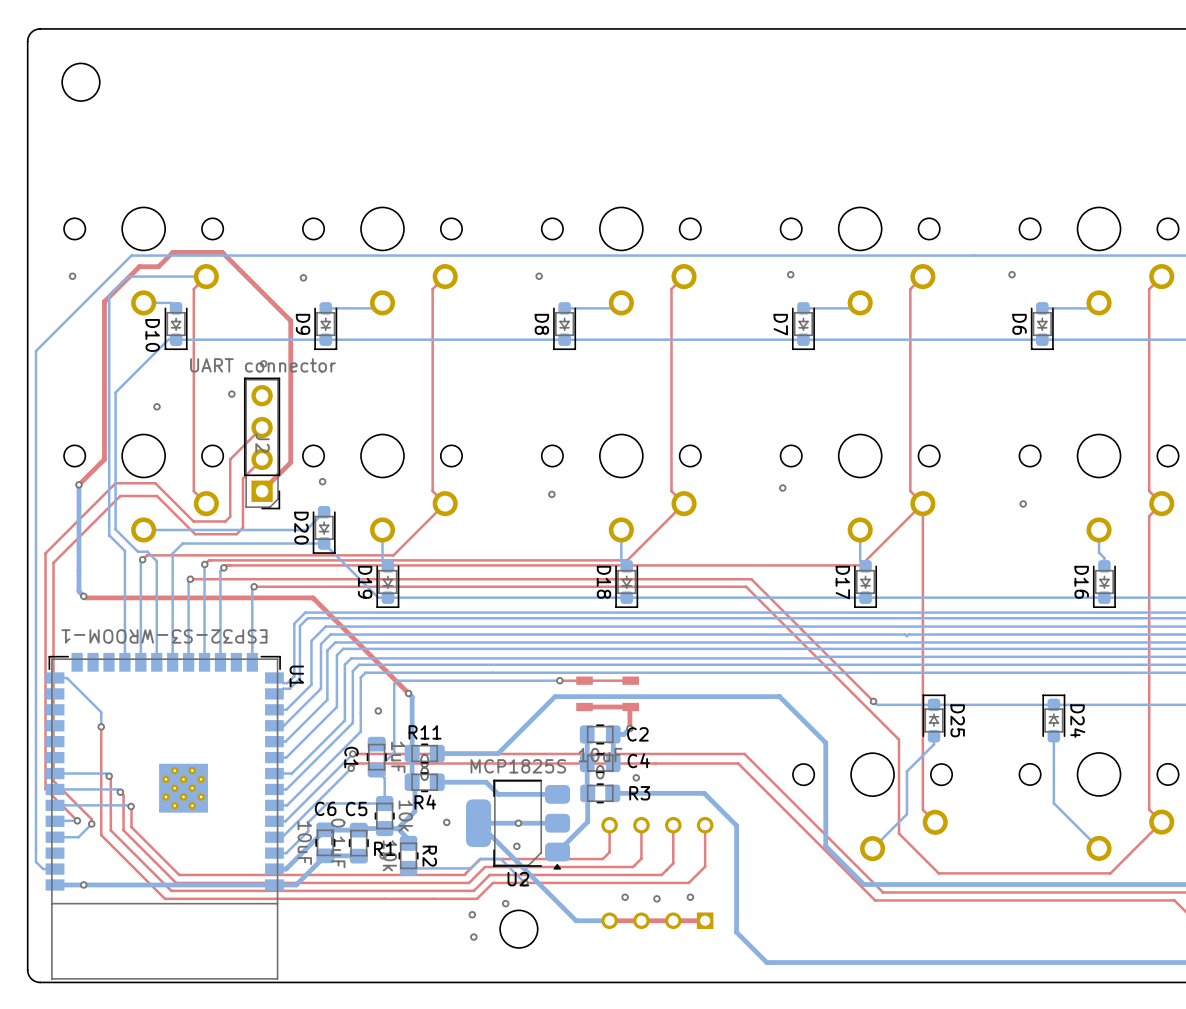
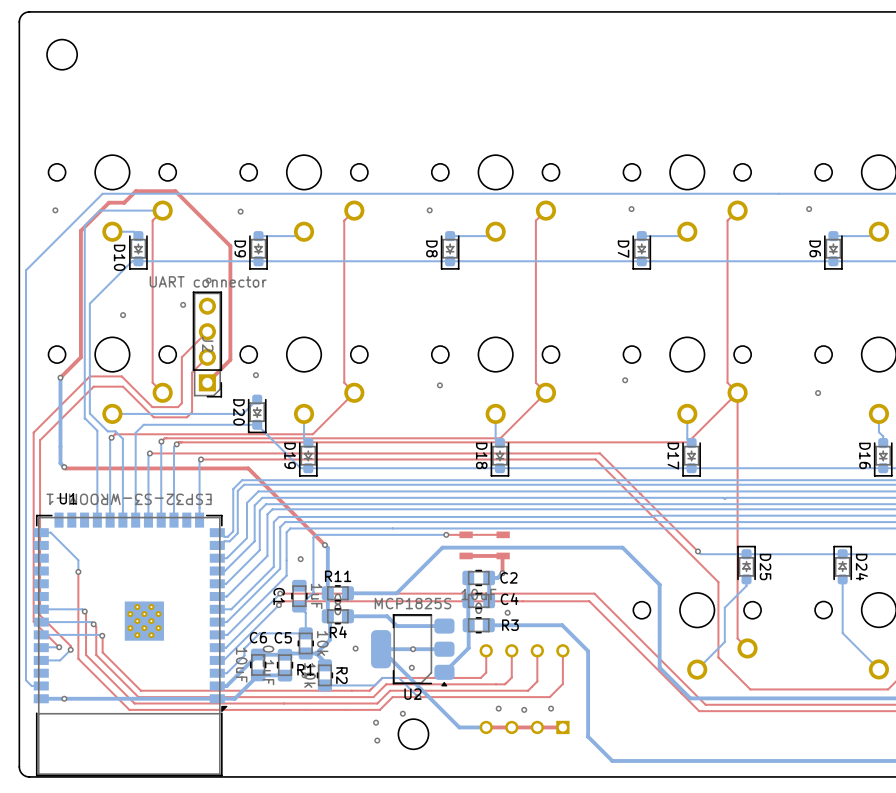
U1 footprint: [45, 652, 284, 980] -> [33, 512, 228, 777]
U1 name position: U1 (296, 676) -> U1 (68, 498)

